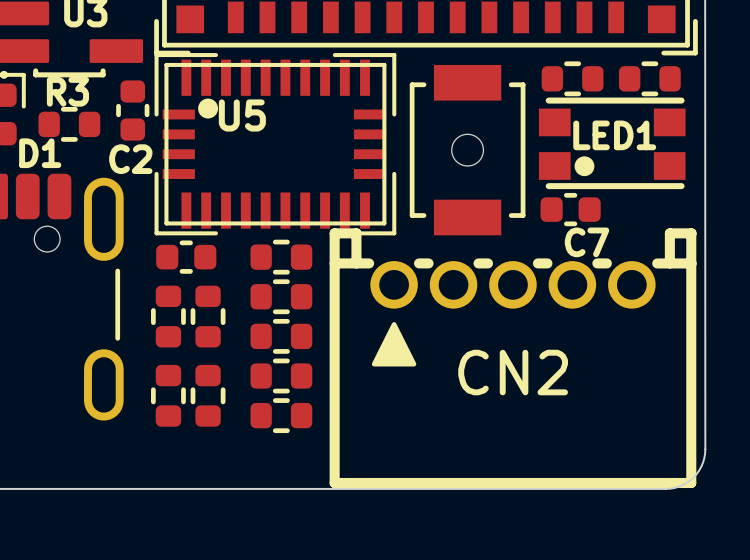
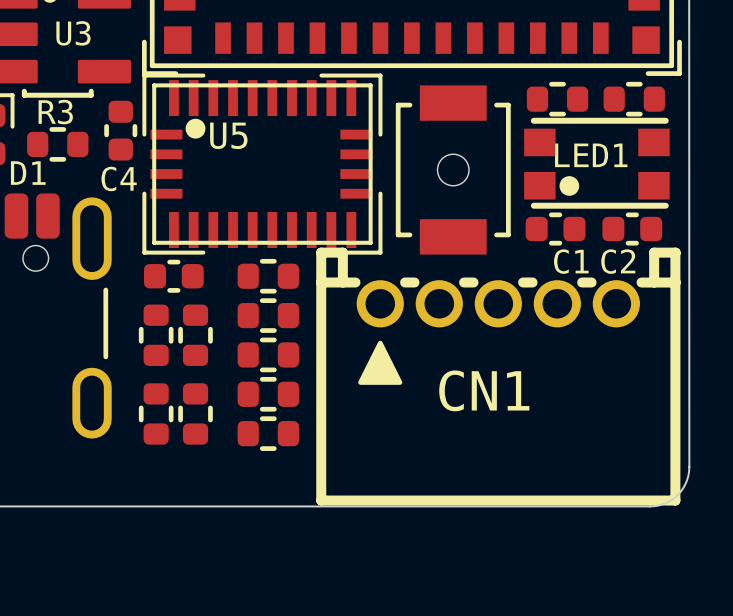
C2 name: C2 (130, 159) -> C4 (119, 178)
C2: none -> (632, 229)
C7 name: C7 (587, 242) -> C1 (571, 261)
CN2 name: CN2 (513, 372) -> CN1 (484, 390)

